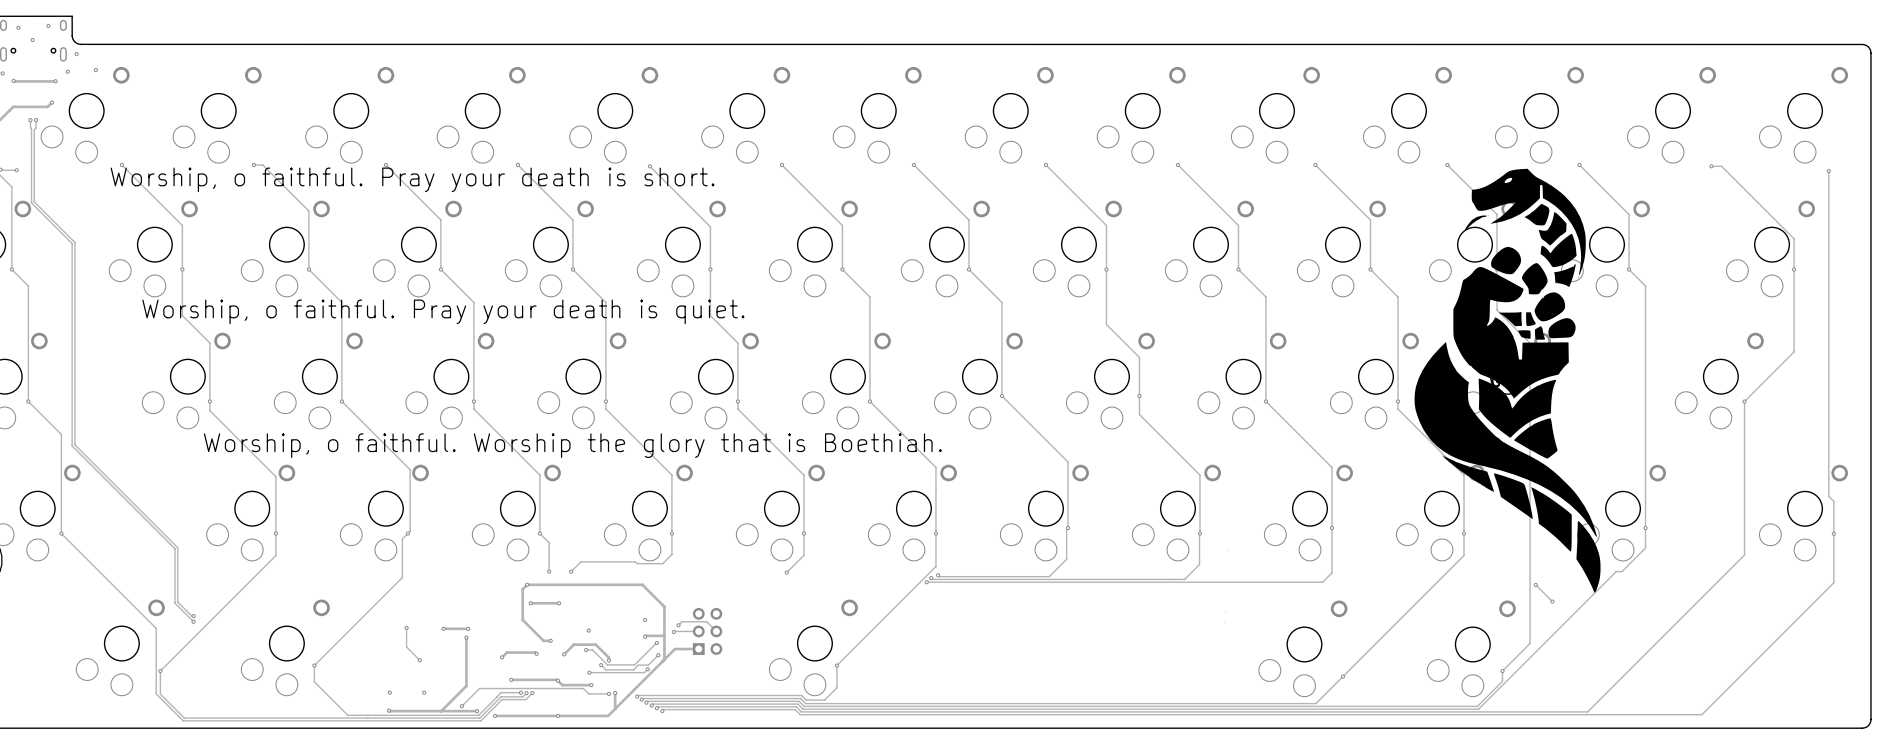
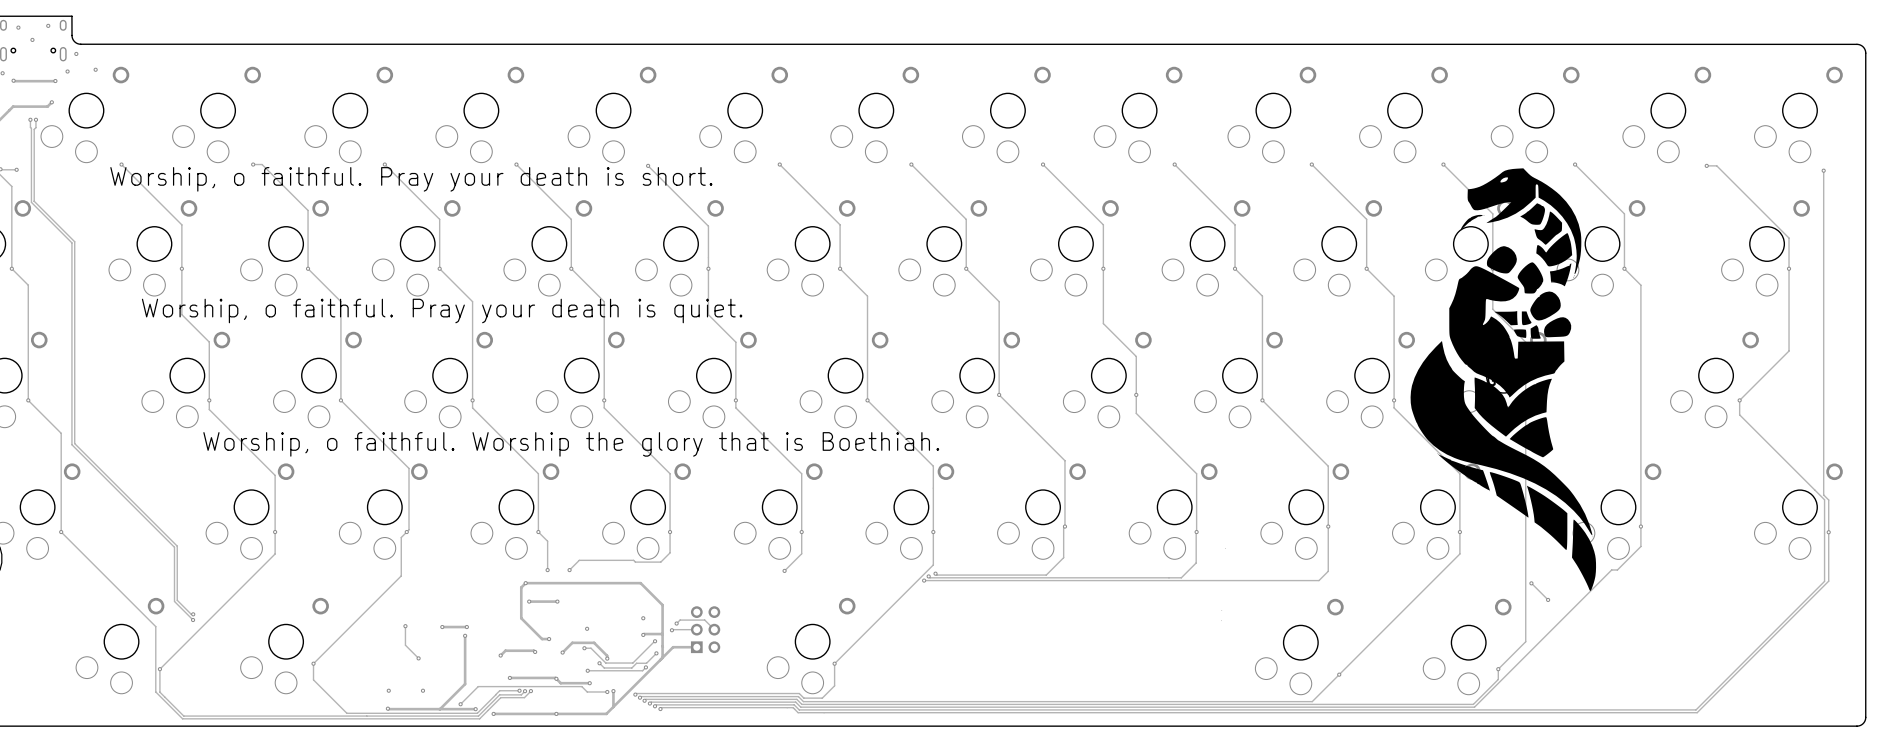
track: (1744, 416) (1744, 555) (1587, 711) -> (1739, 414) (1824, 499) (1824, 581) (1696, 709) (1583, 709)

